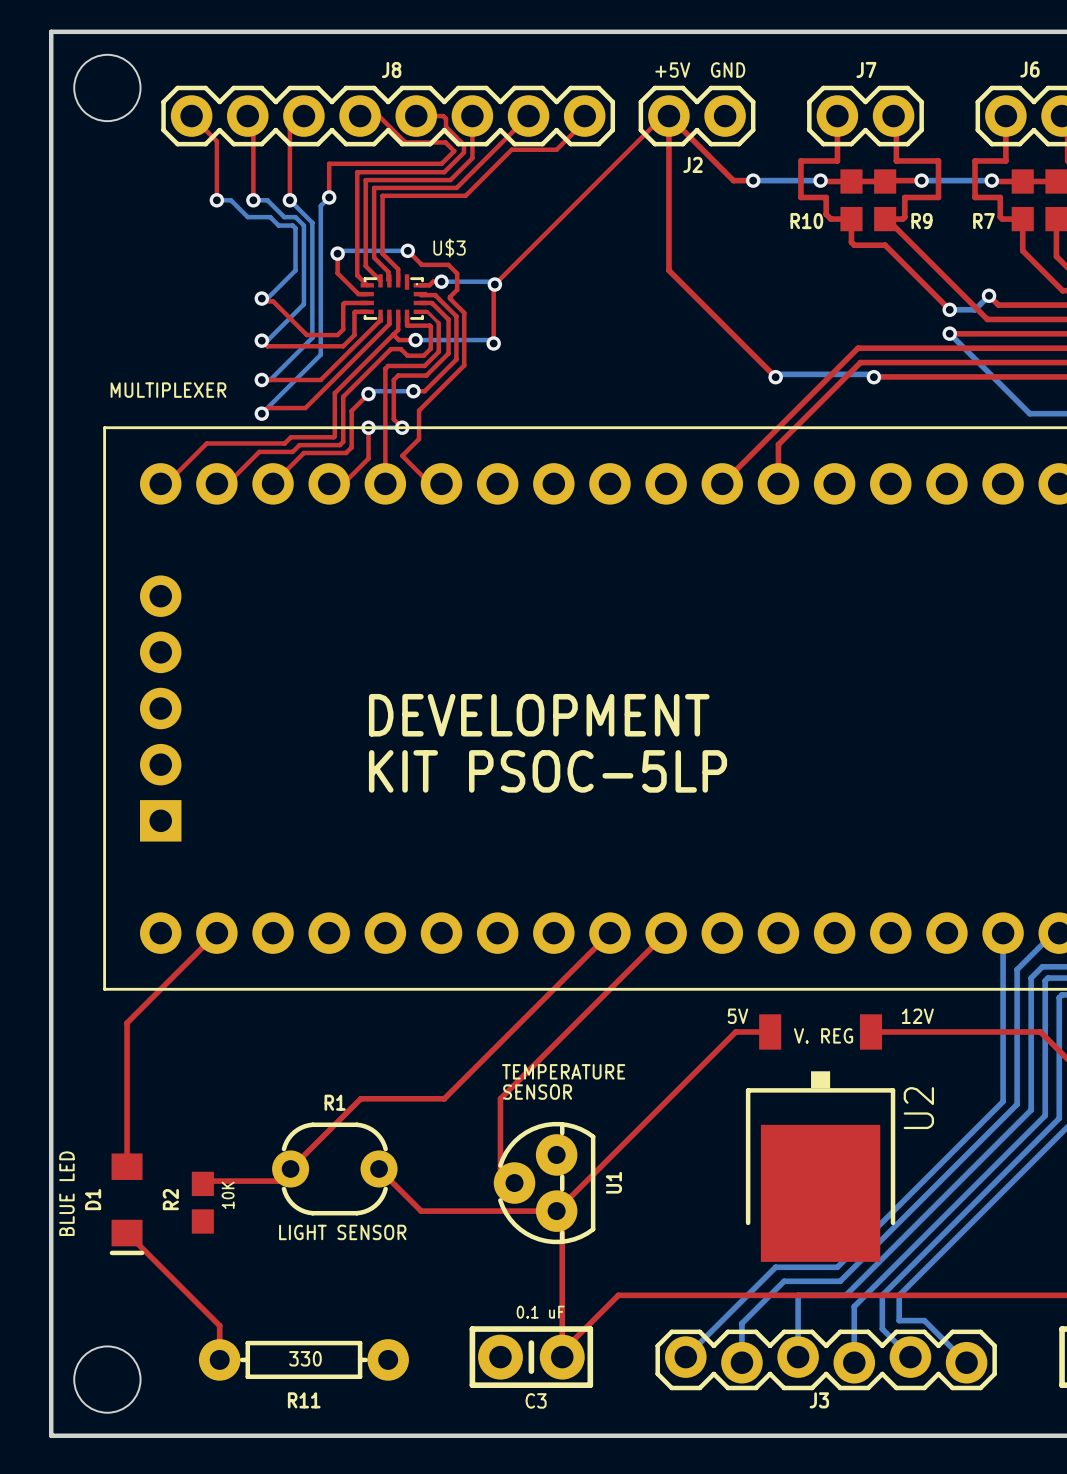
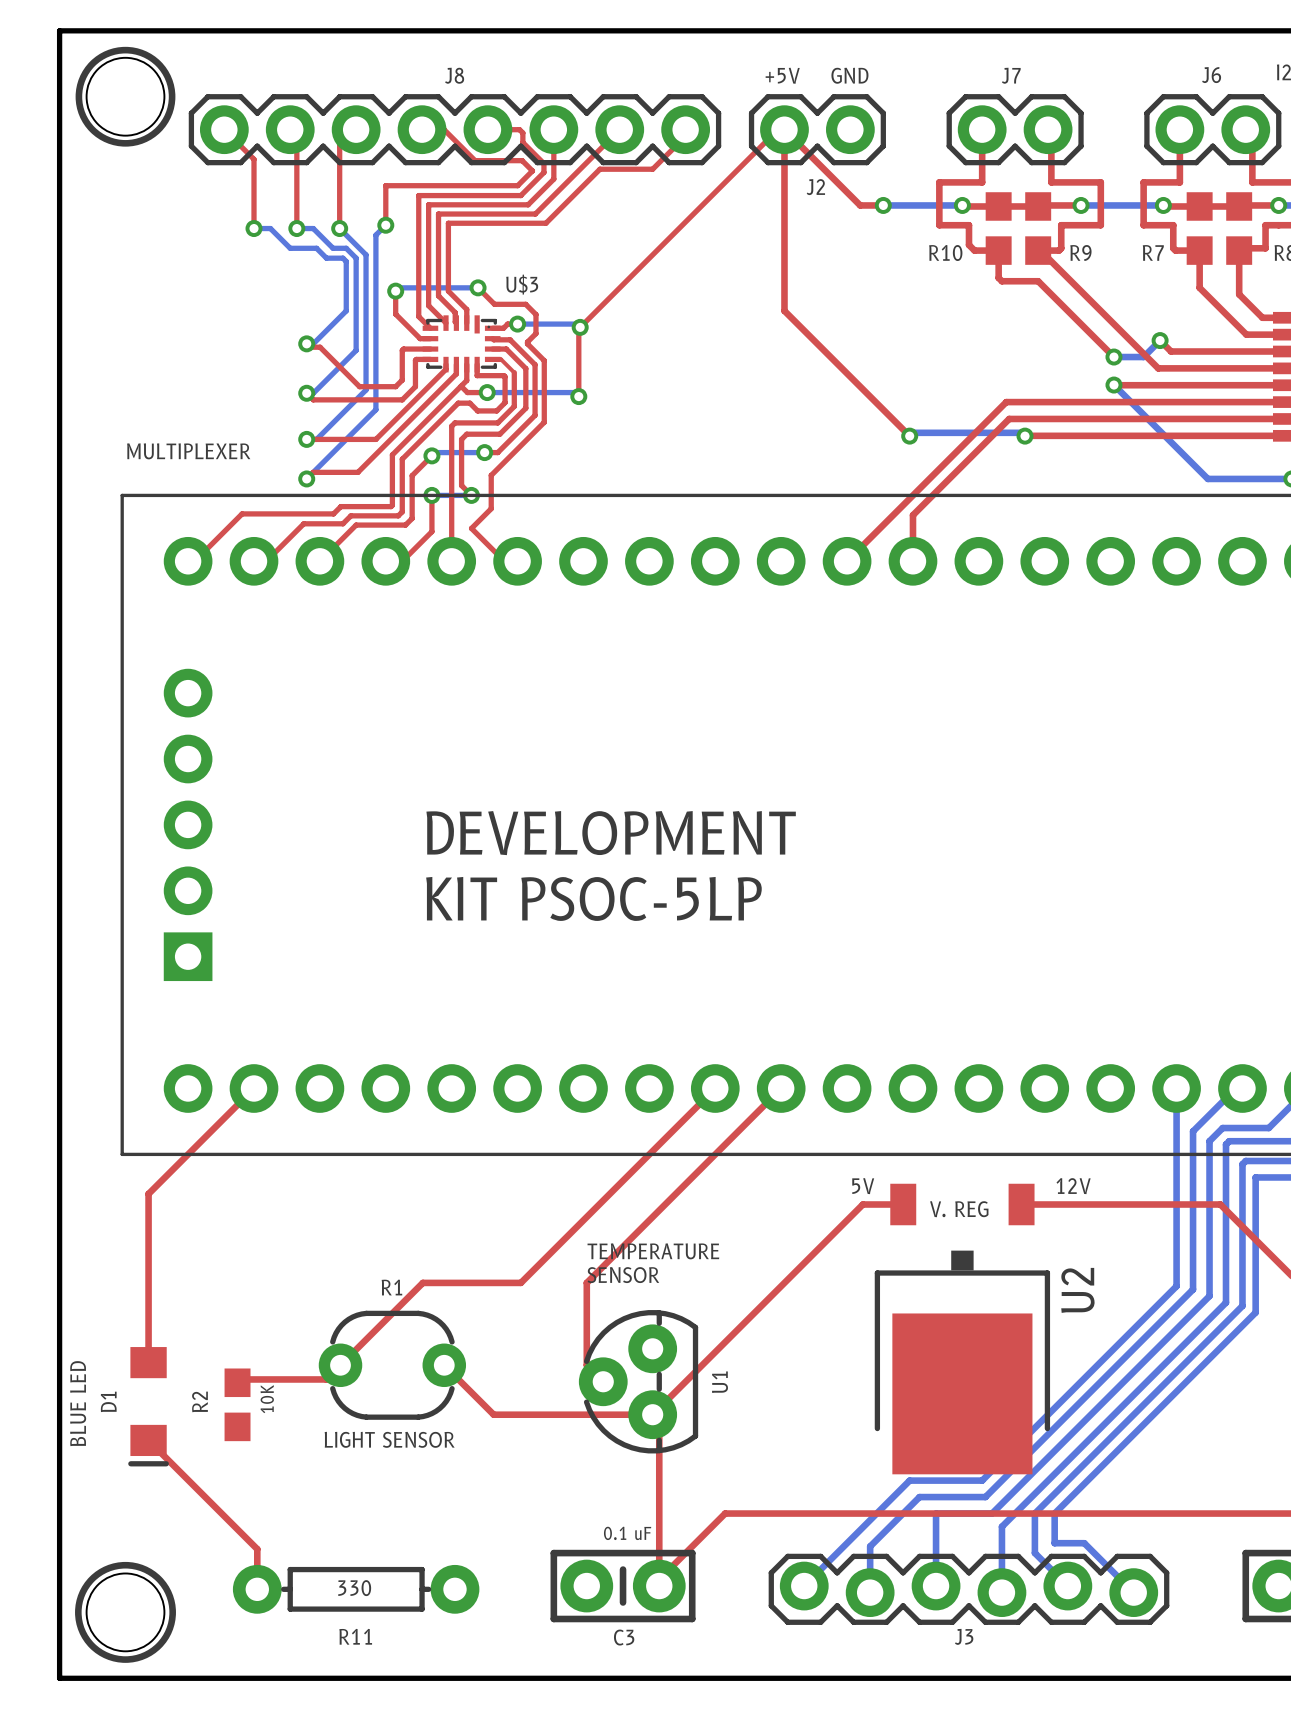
drawing: none -> [75, 46, 176, 147]
drawing: none -> [75, 1561, 176, 1663]

